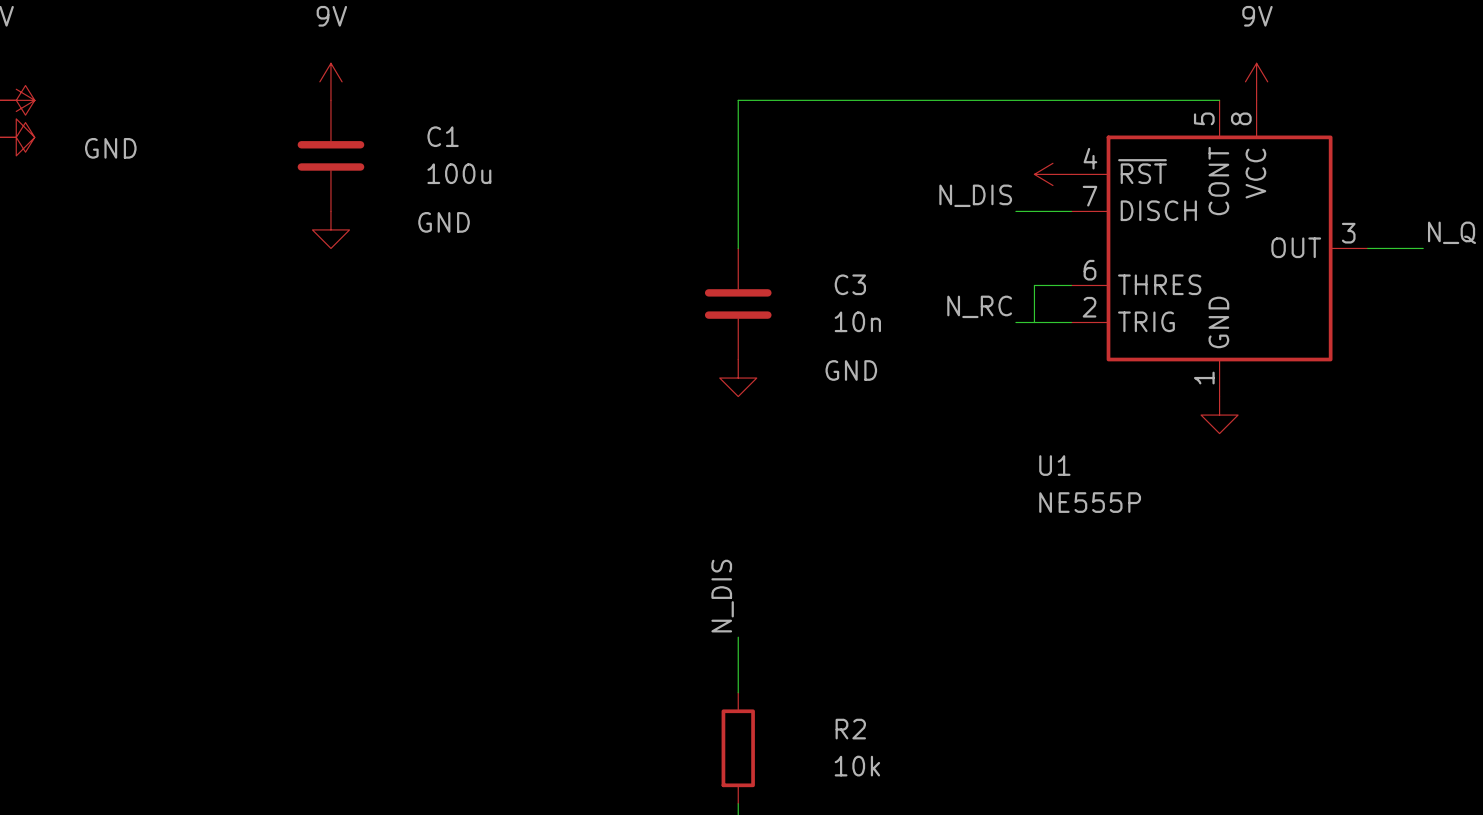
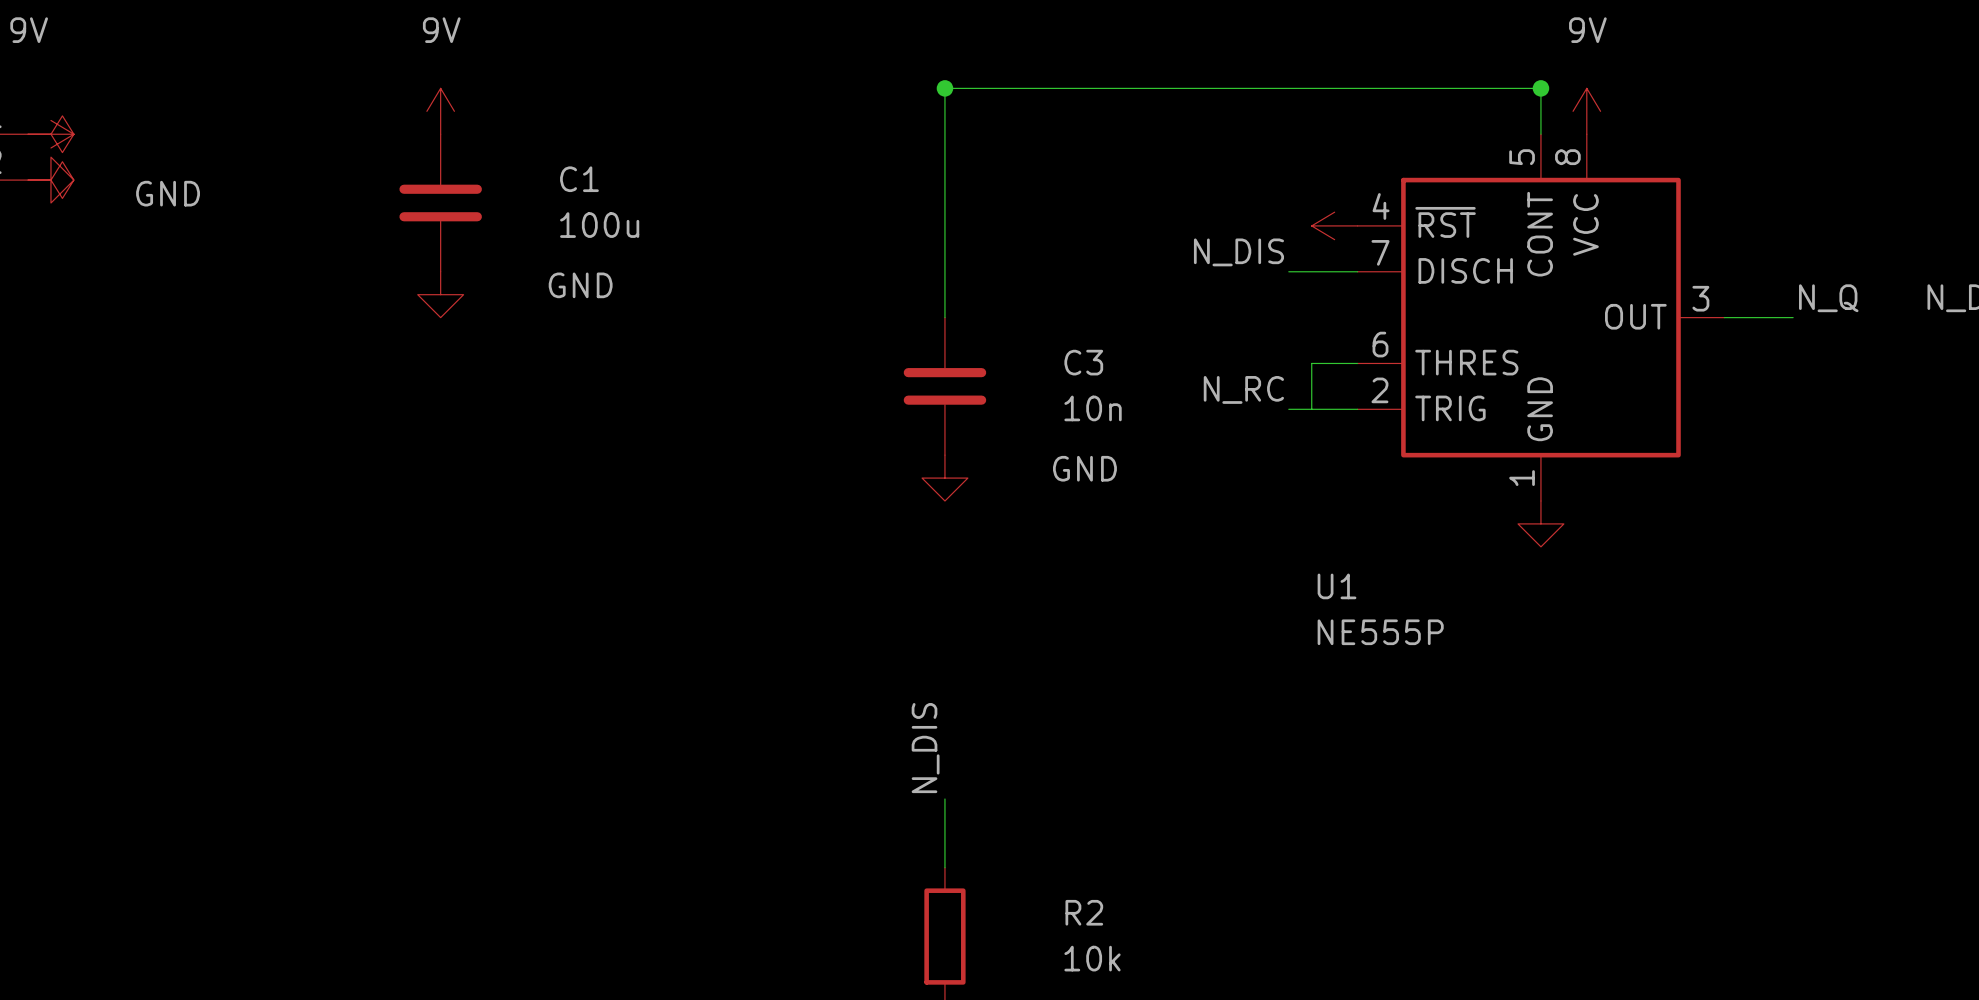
junction: none -> (944, 88)
junction: none -> (1540, 88)
wire: (738, 100) (1219, 100) -> (944, 134) (944, 88) (1540, 88) (1540, 134)

